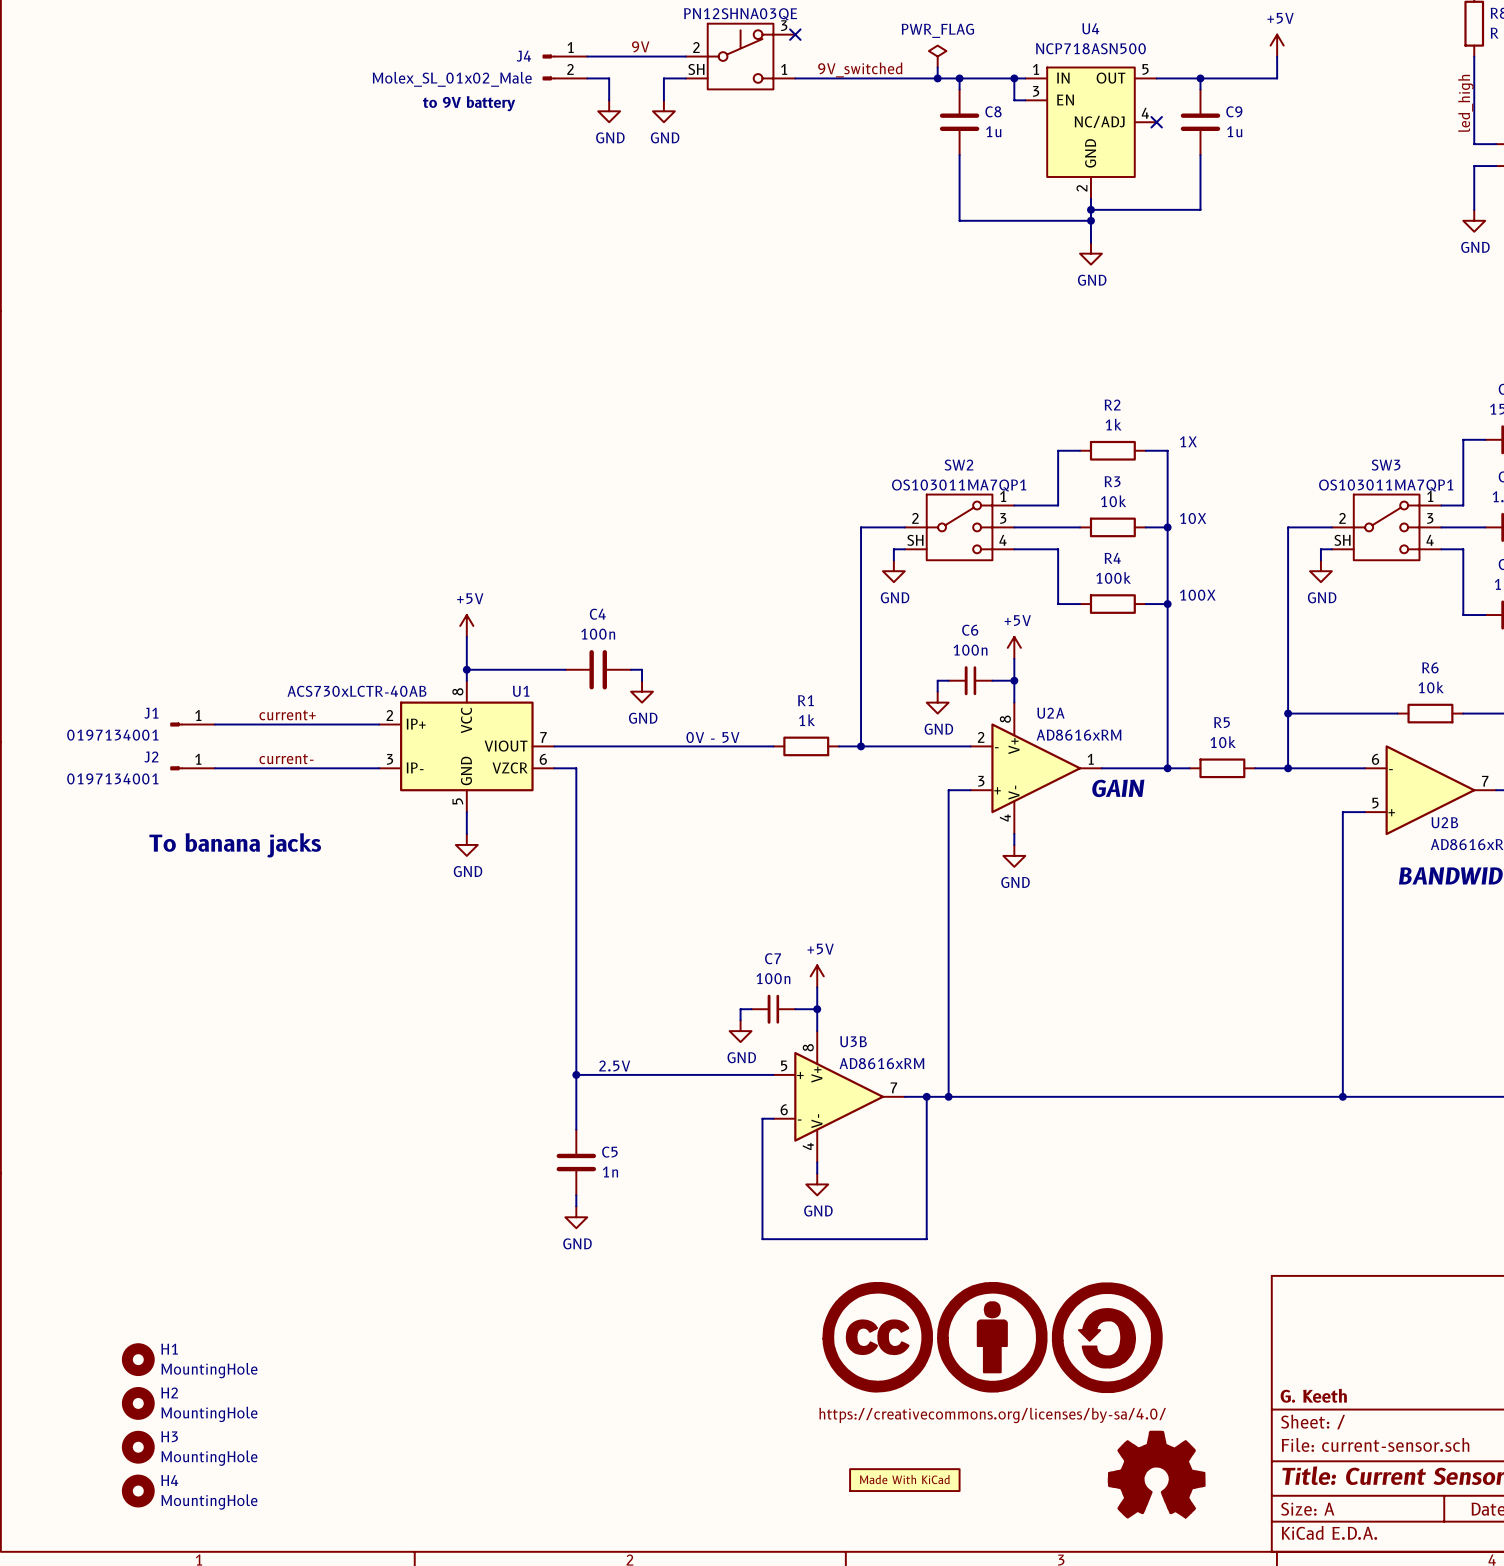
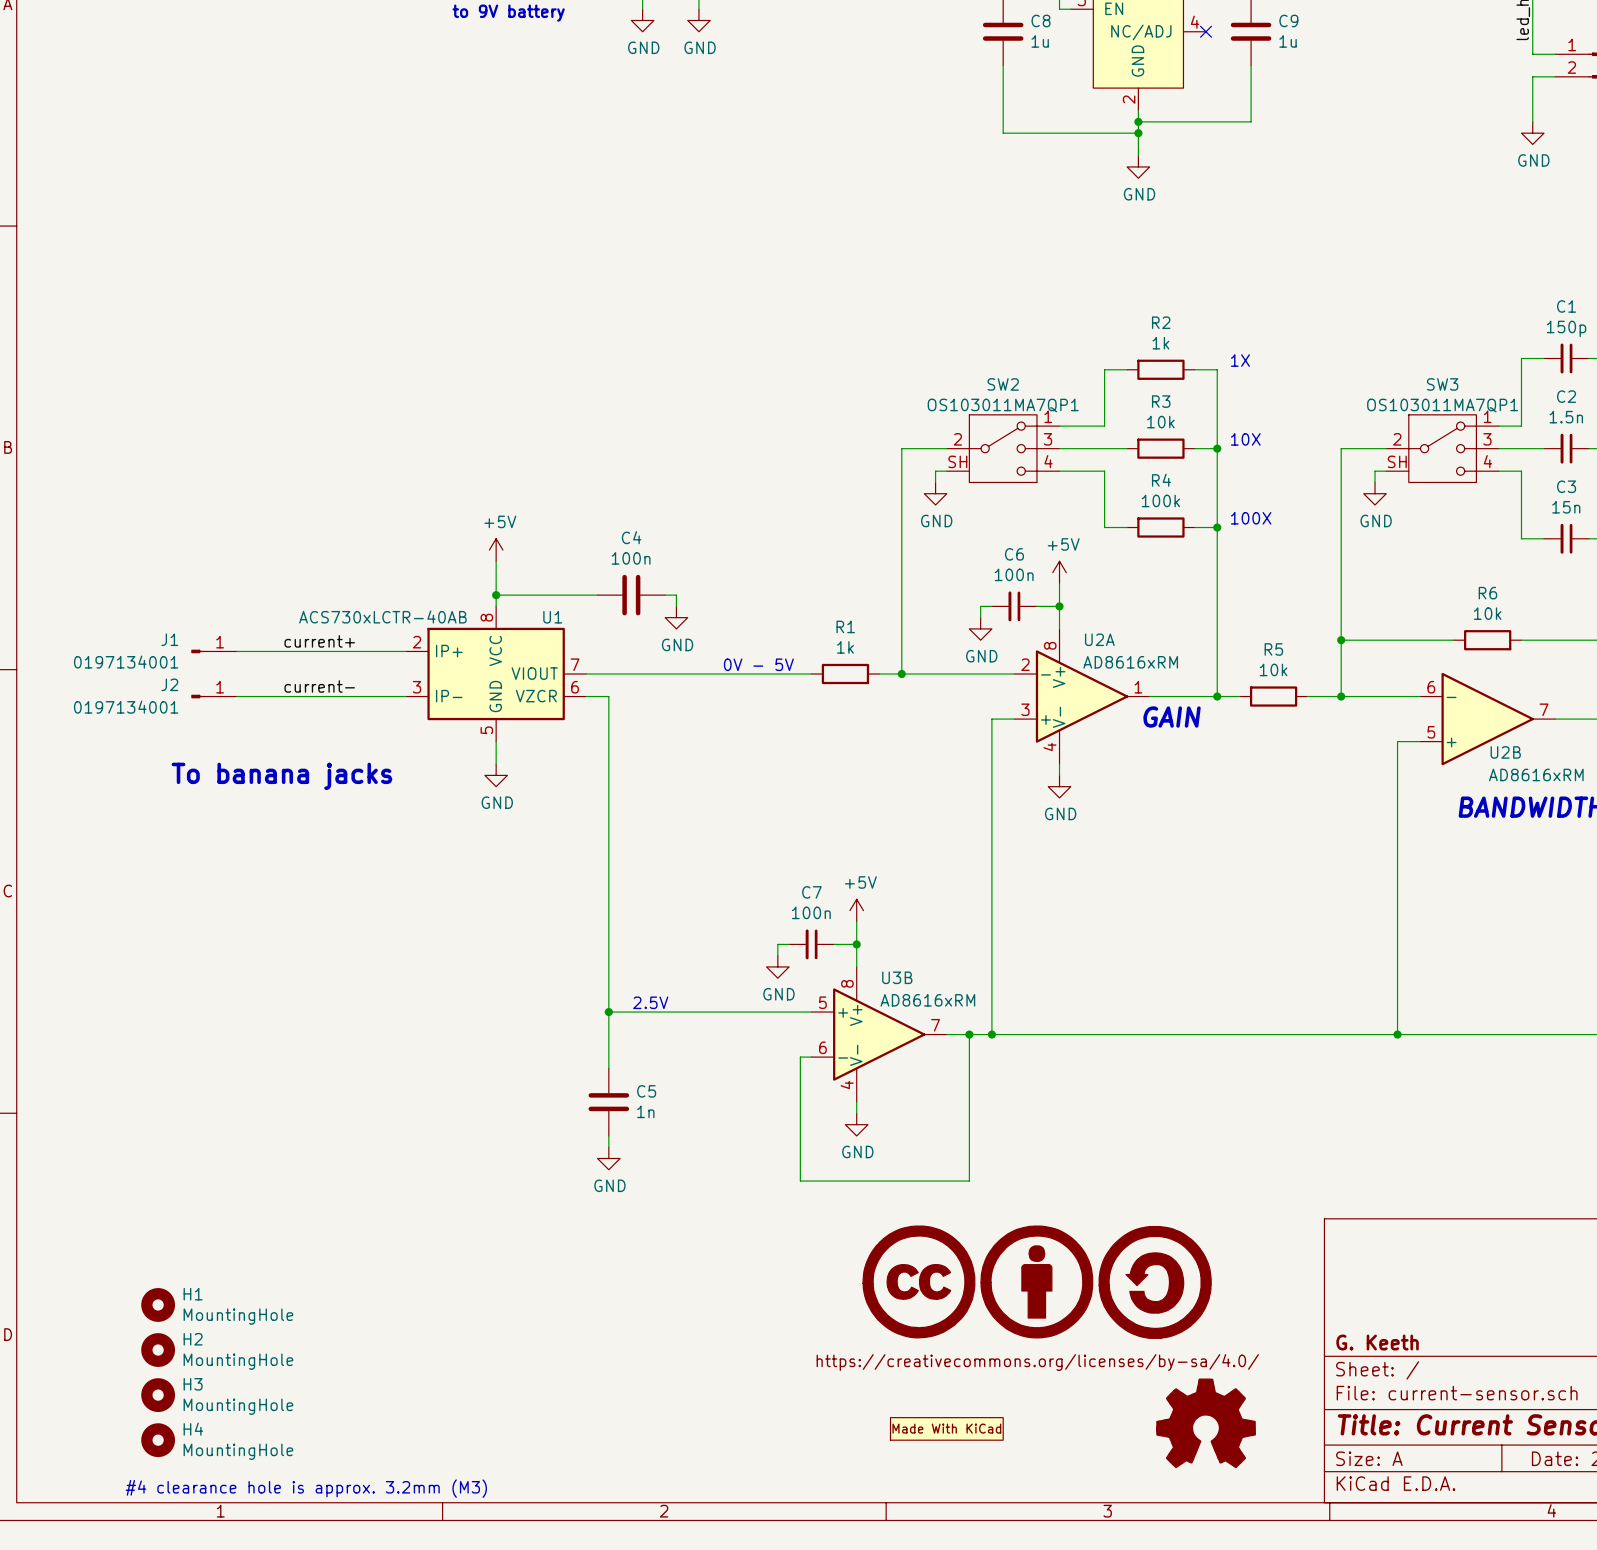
text: none -> #4 clearance hole is approx. 3.2mm (M3) (306, 1488)

